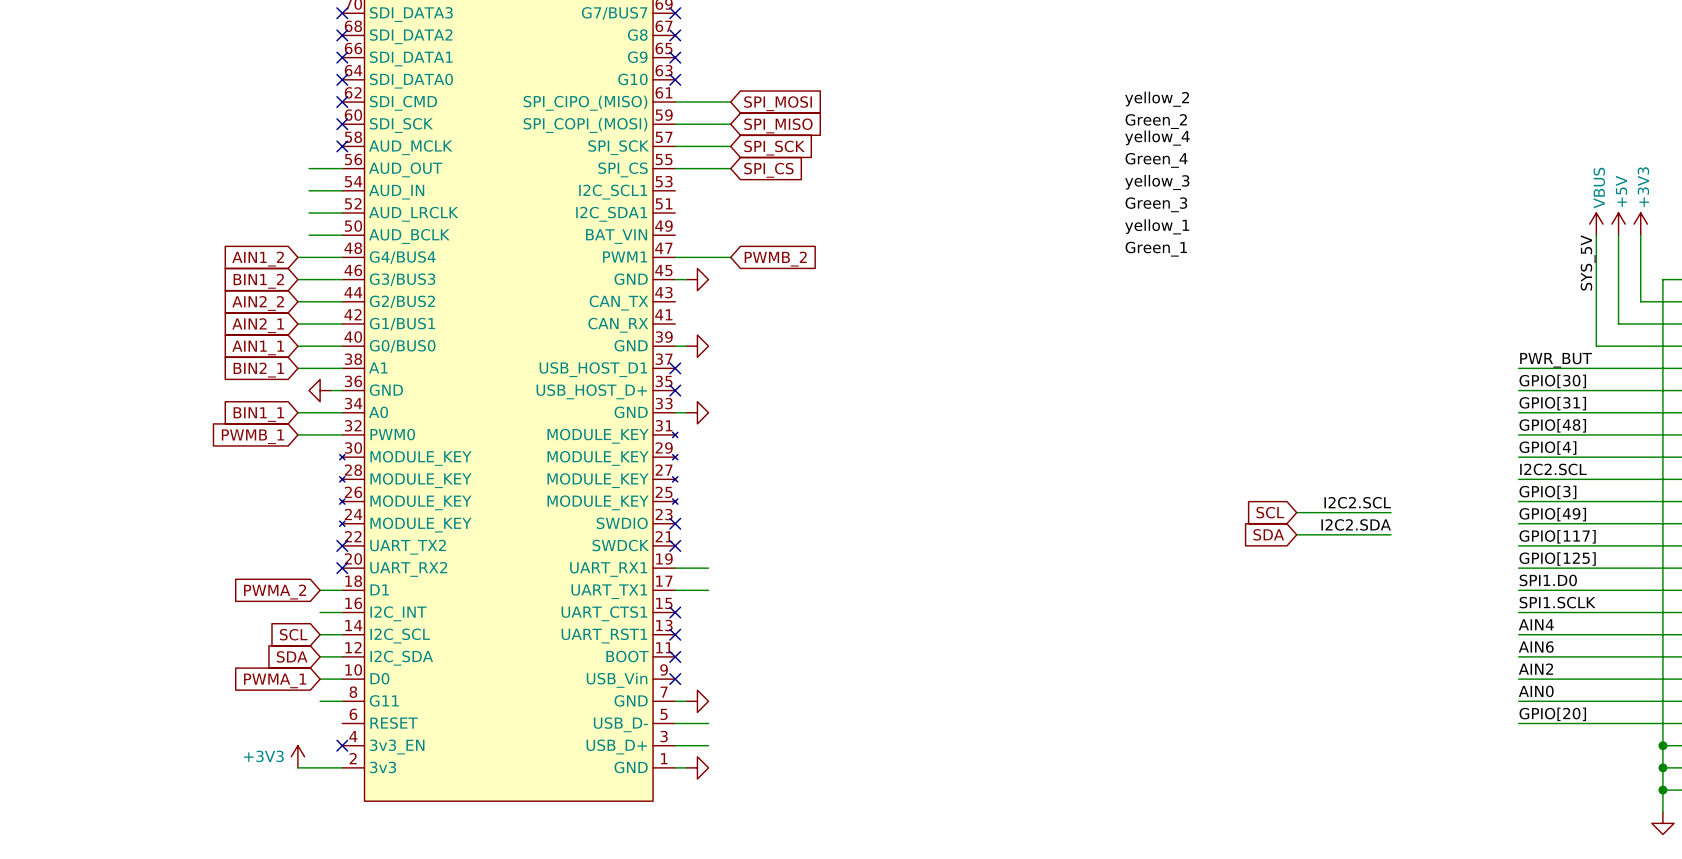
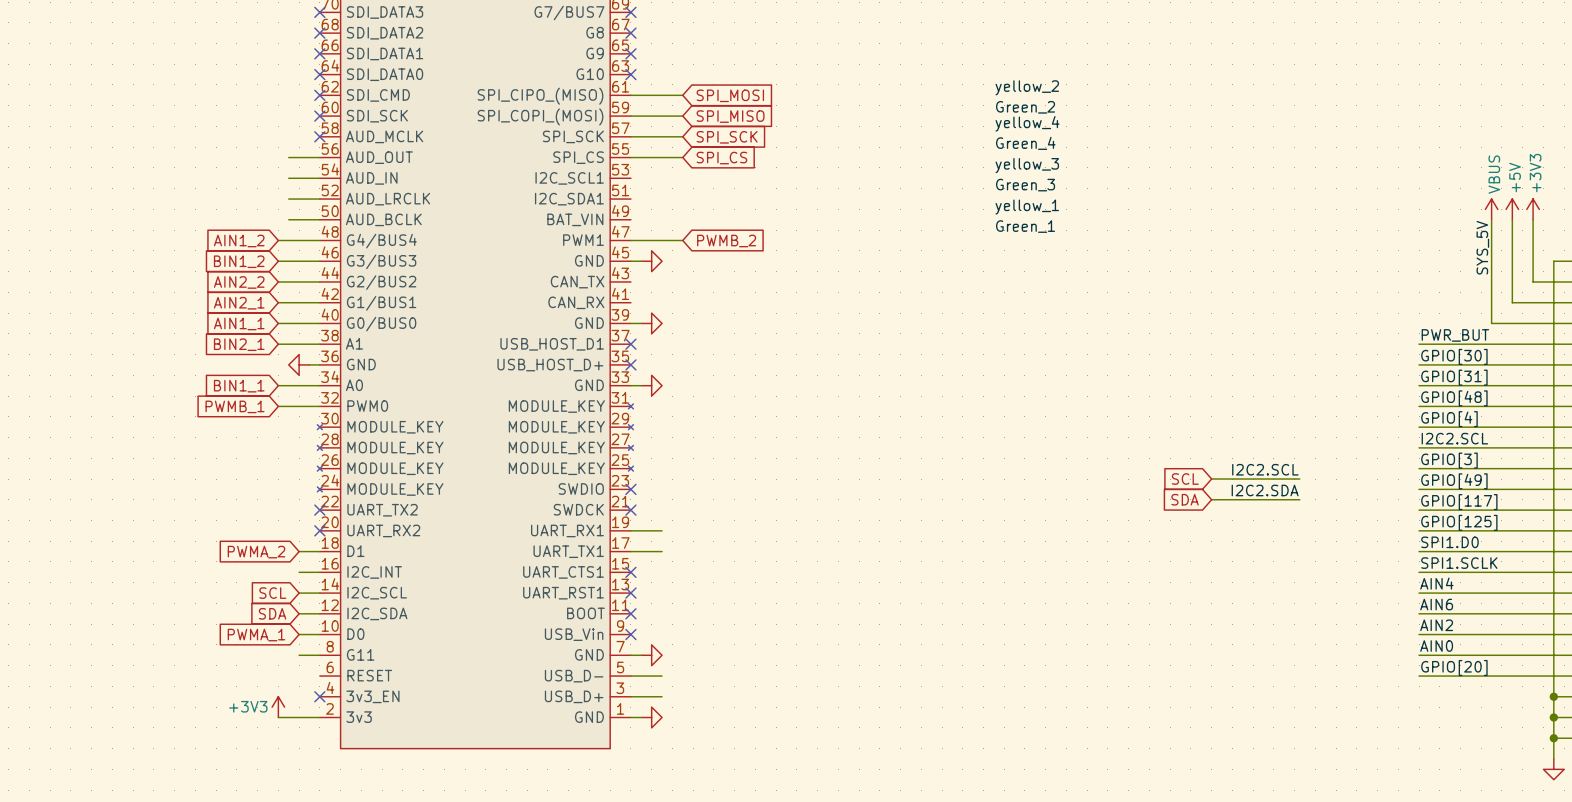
label position: yellow_2 (1157, 99) -> yellow_2 (1027, 87)
label position: Green_2 (1156, 121) -> Green_2 (1025, 107)
label position: yellow_4 (1157, 138) -> yellow_4 (1027, 123)
label position: Green_4 (1156, 160) -> Green_4 (1025, 143)
label position: yellow_3 (1157, 182) -> yellow_3 (1027, 165)
label position: Green_3 (1156, 204) -> Green_3 (1025, 185)
label position: yellow_1 (1157, 226) -> yellow_1 (1027, 207)
label position: Green_1 (1156, 249) -> Green_1 (1025, 226)

